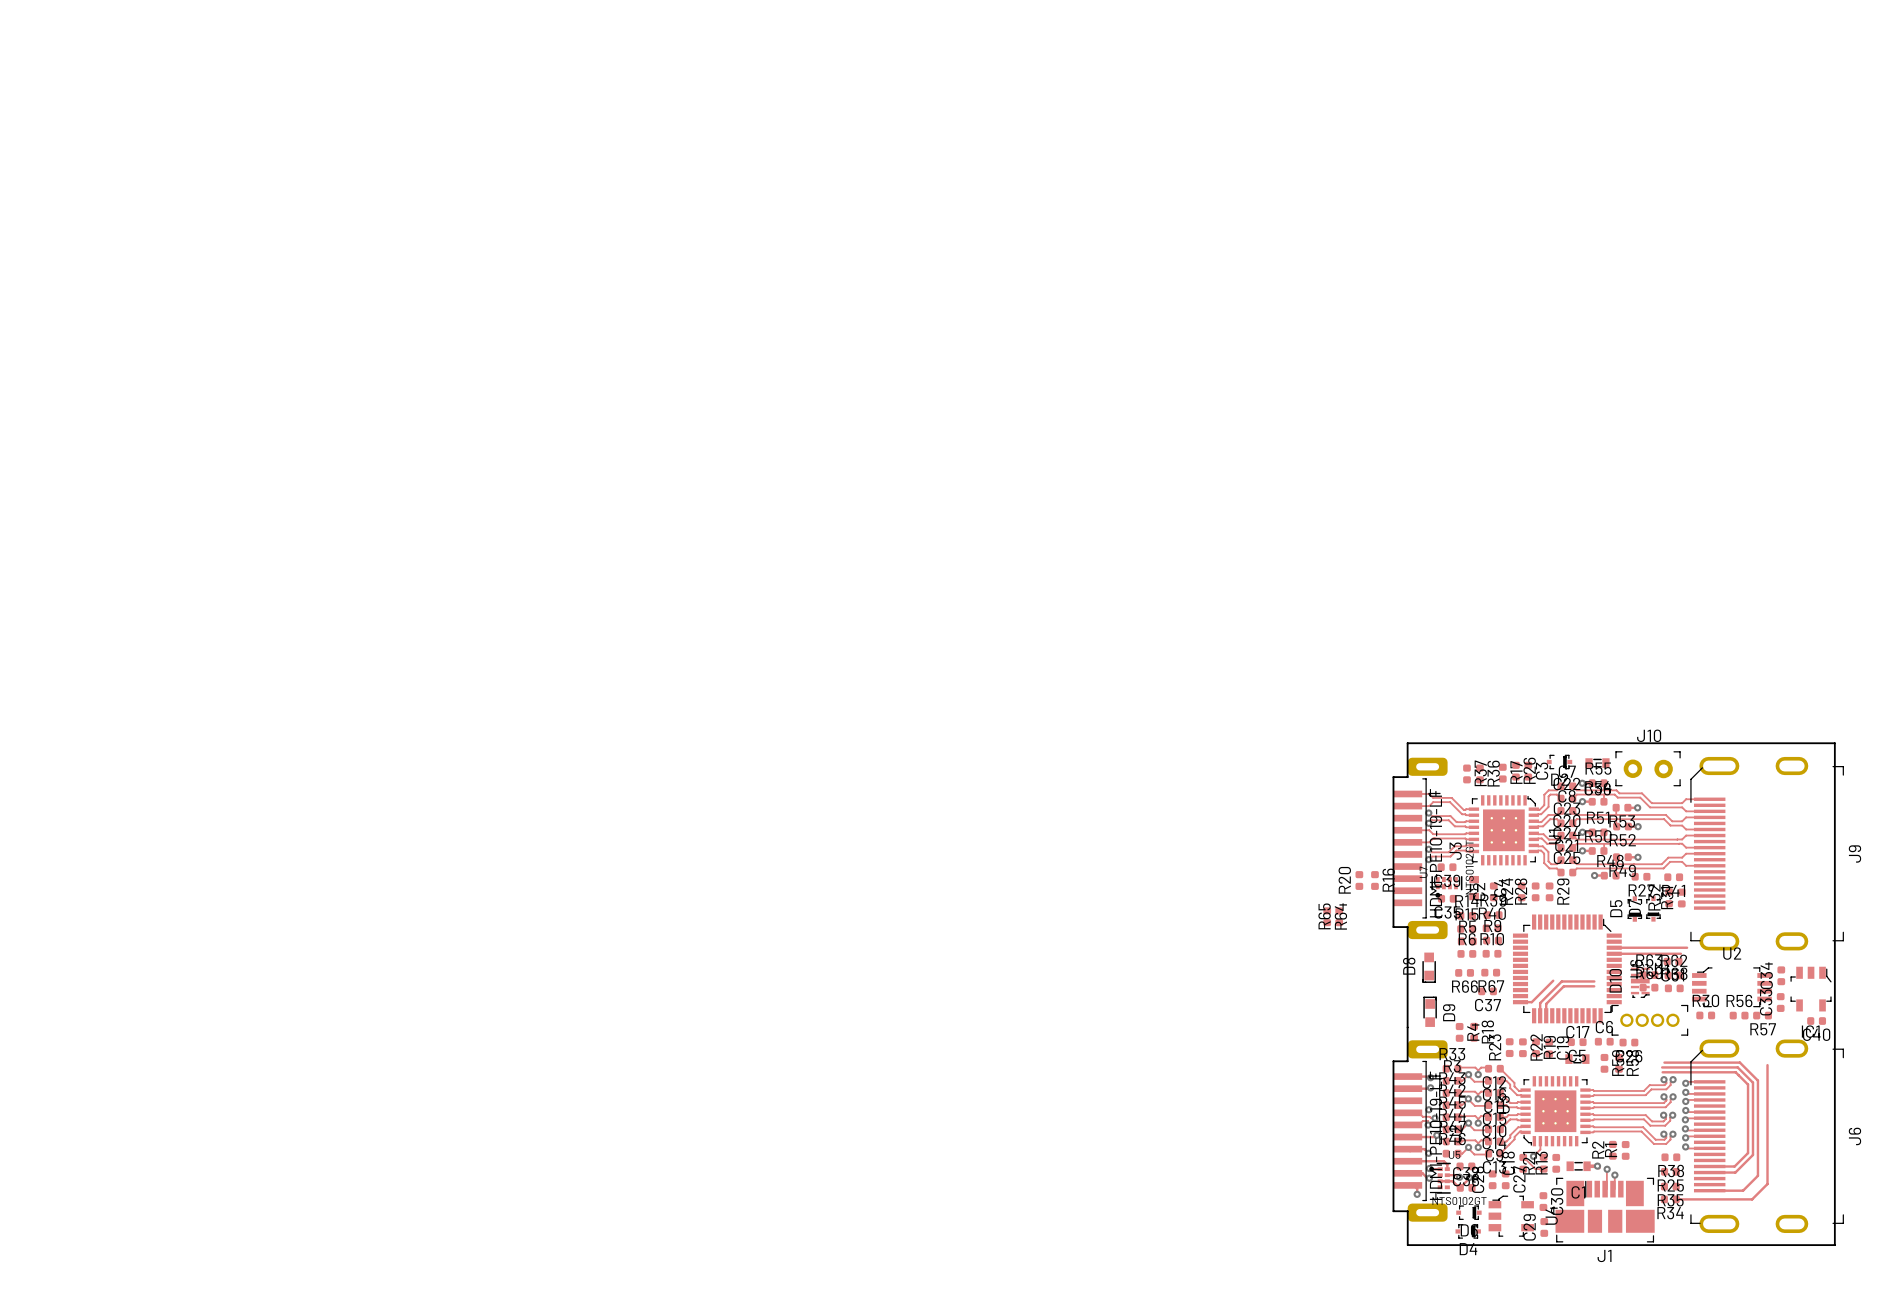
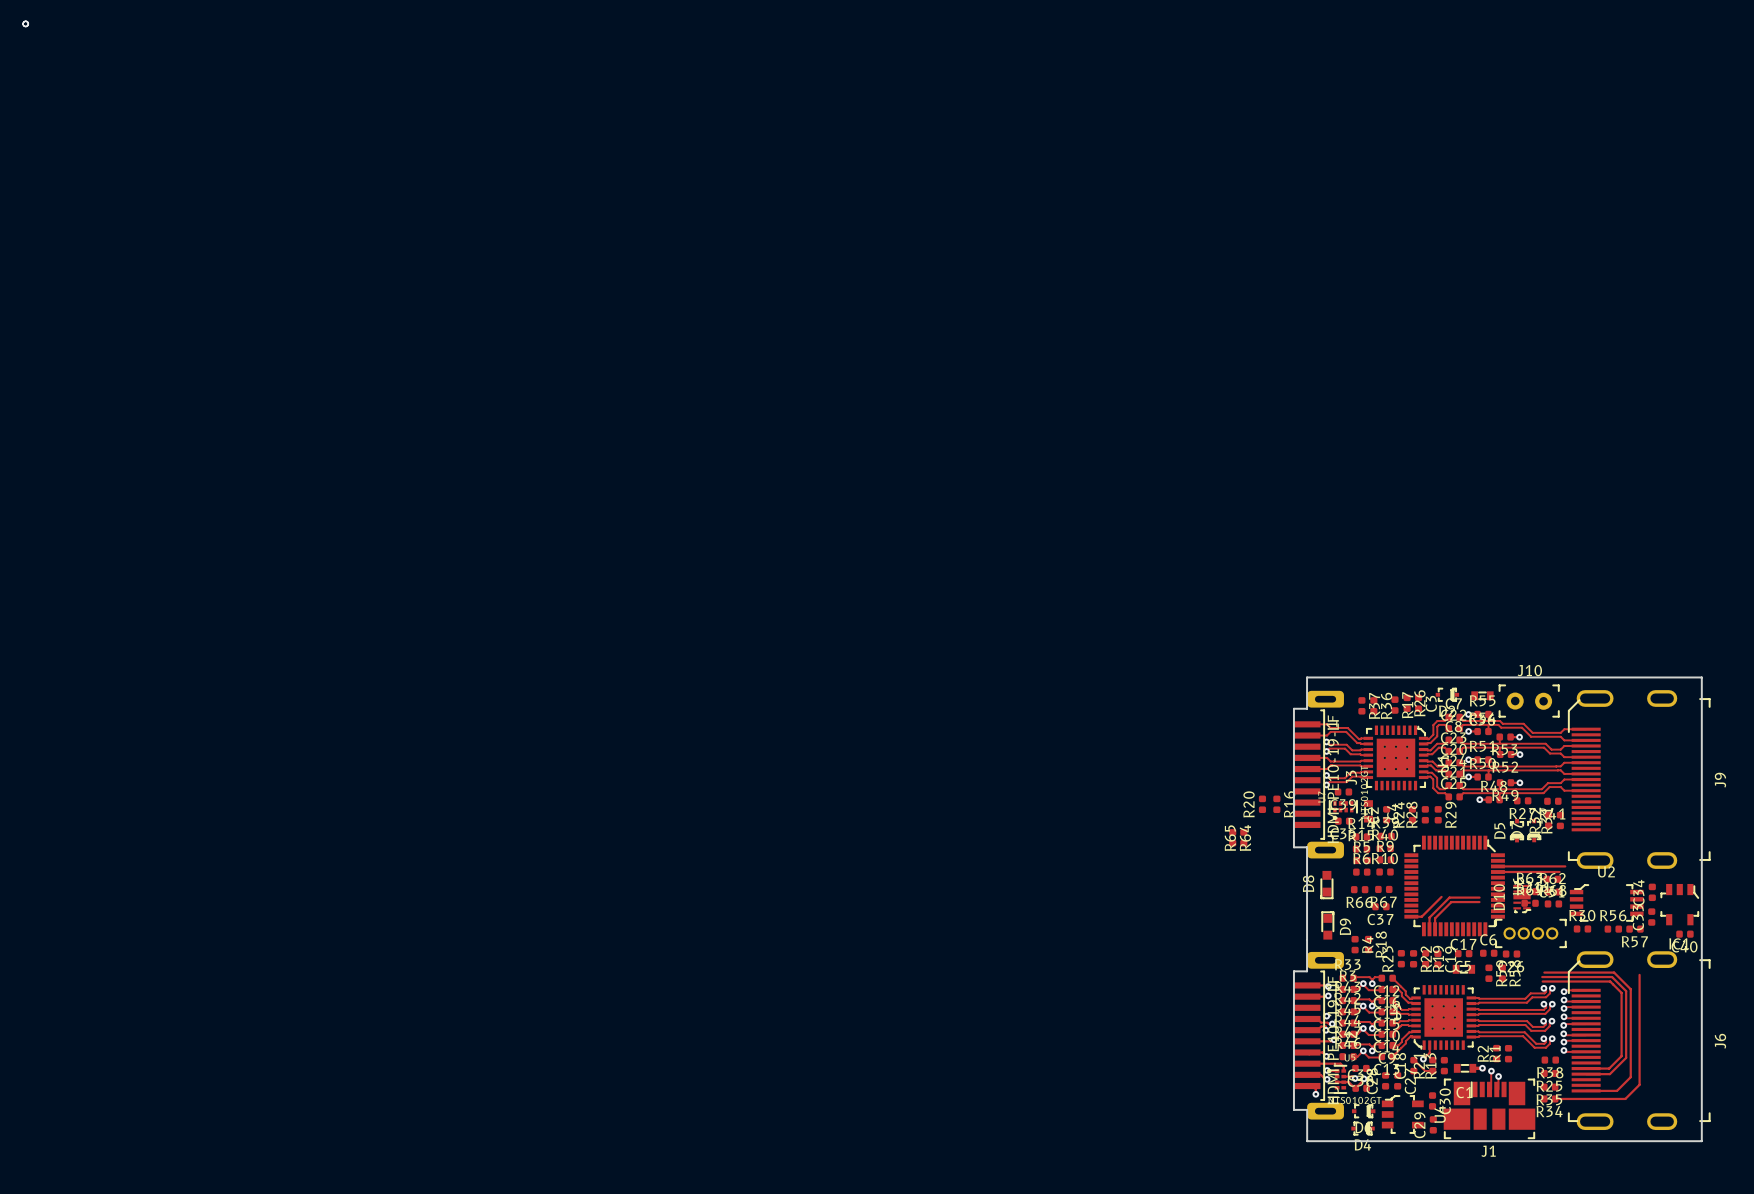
via: none -> (25, 23)

